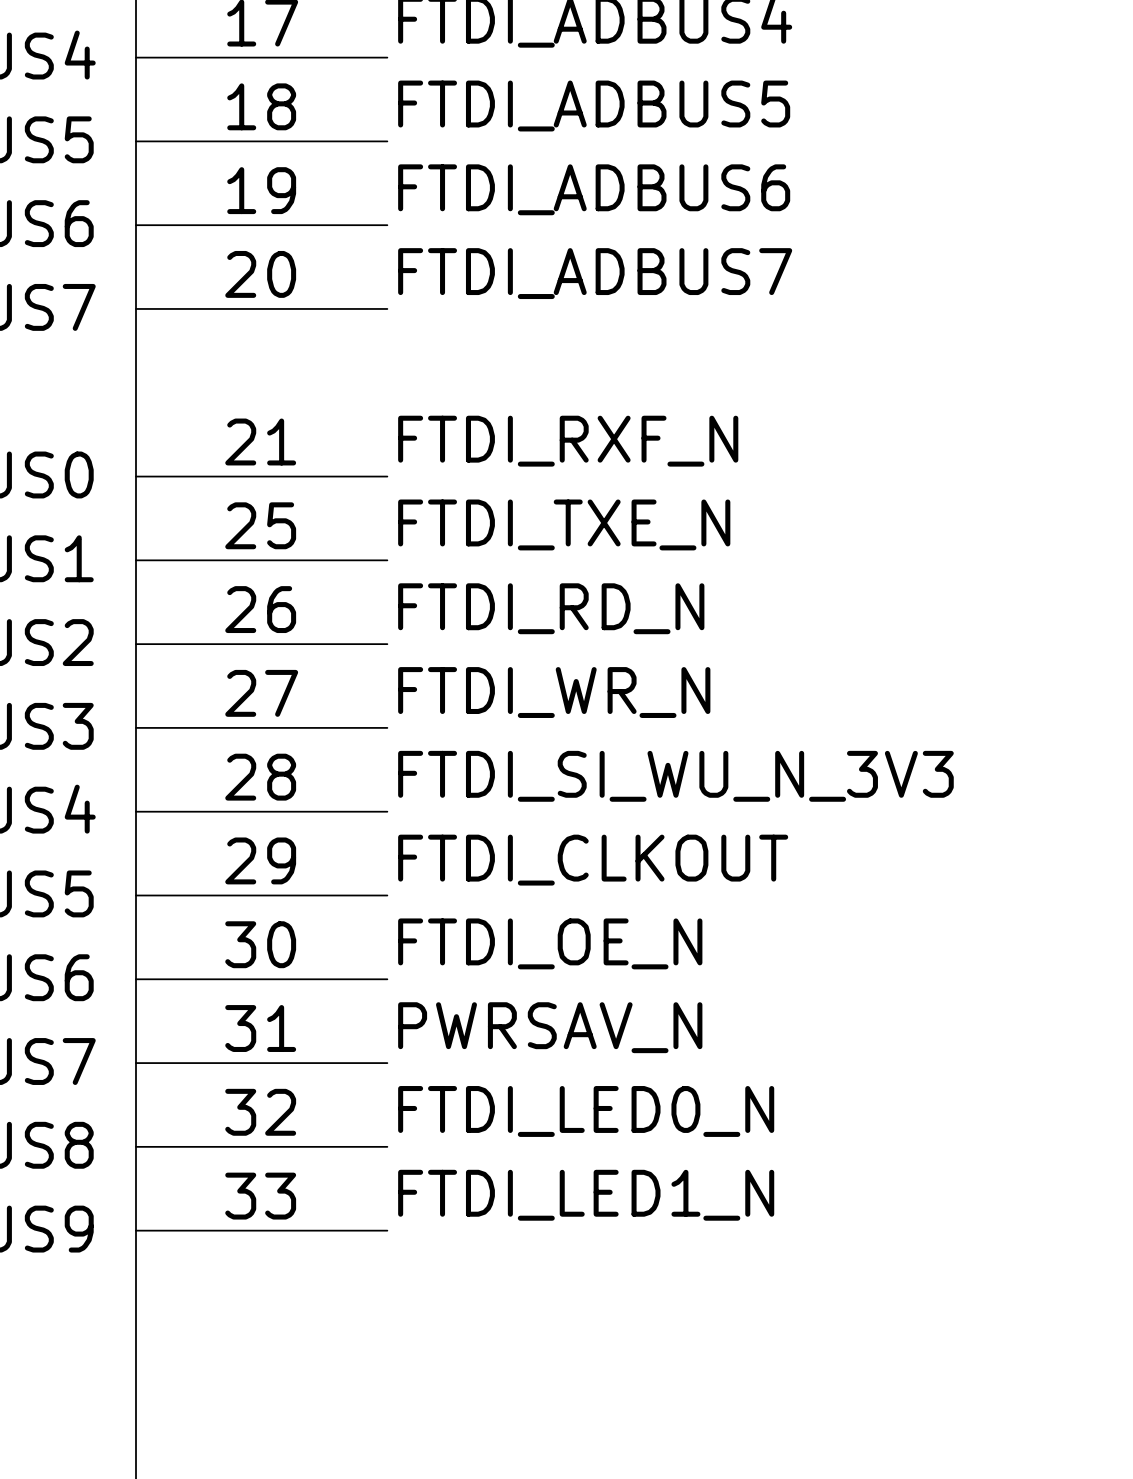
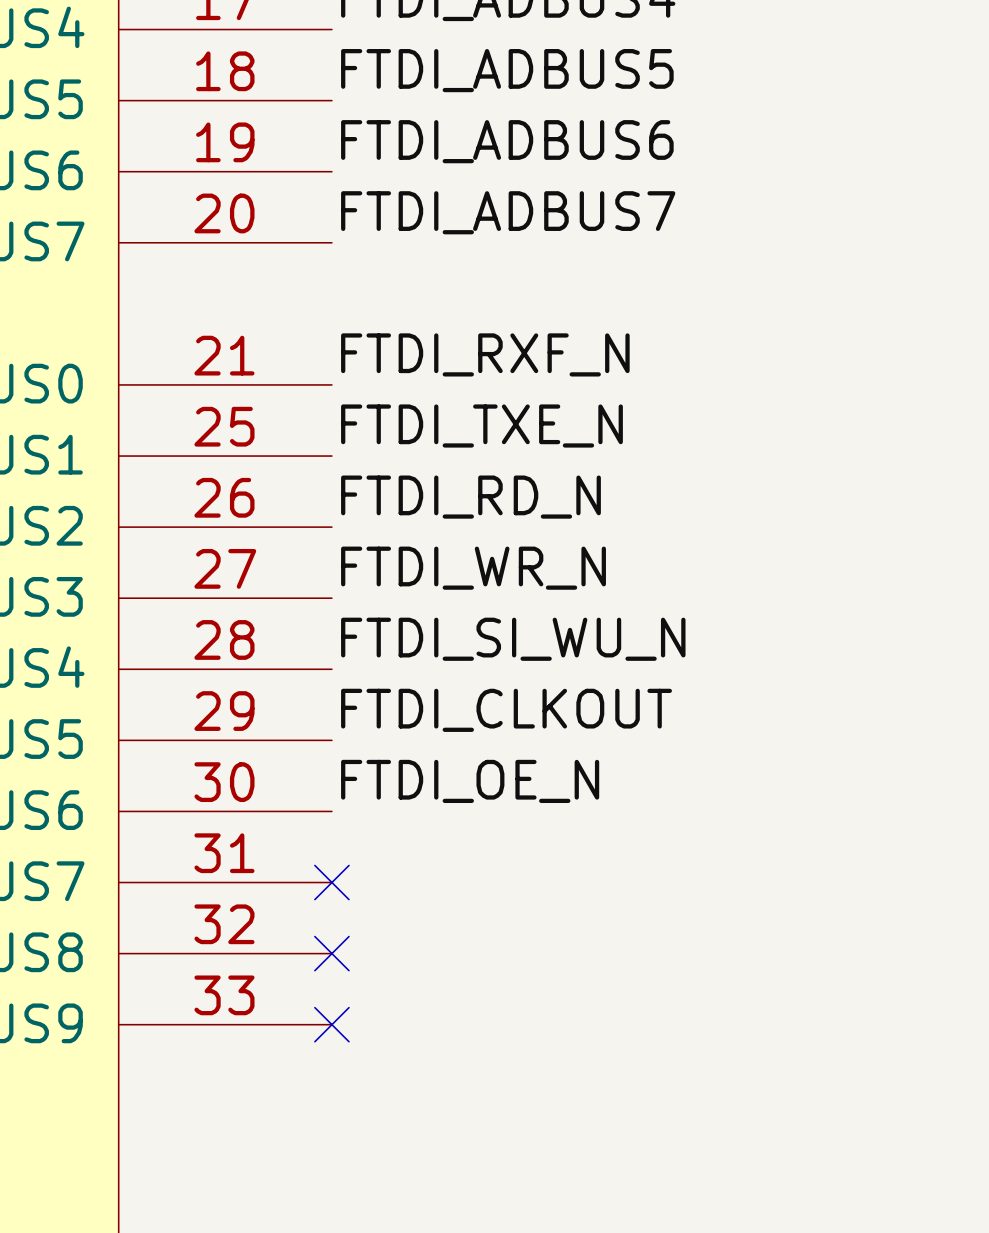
label: FTDI_SI_WU_N_3V3 (675, 776) -> FTDI_SI_WU_N (513, 639)
label: PWRSAV_N (550, 1027) -> none
no-connect mark: none -> (331, 882)
label: FTDI_LED0_N (586, 1111) -> none
no-connect mark: none -> (331, 953)
label: FTDI_LED1_N (586, 1195) -> none
no-connect mark: none -> (331, 1024)

